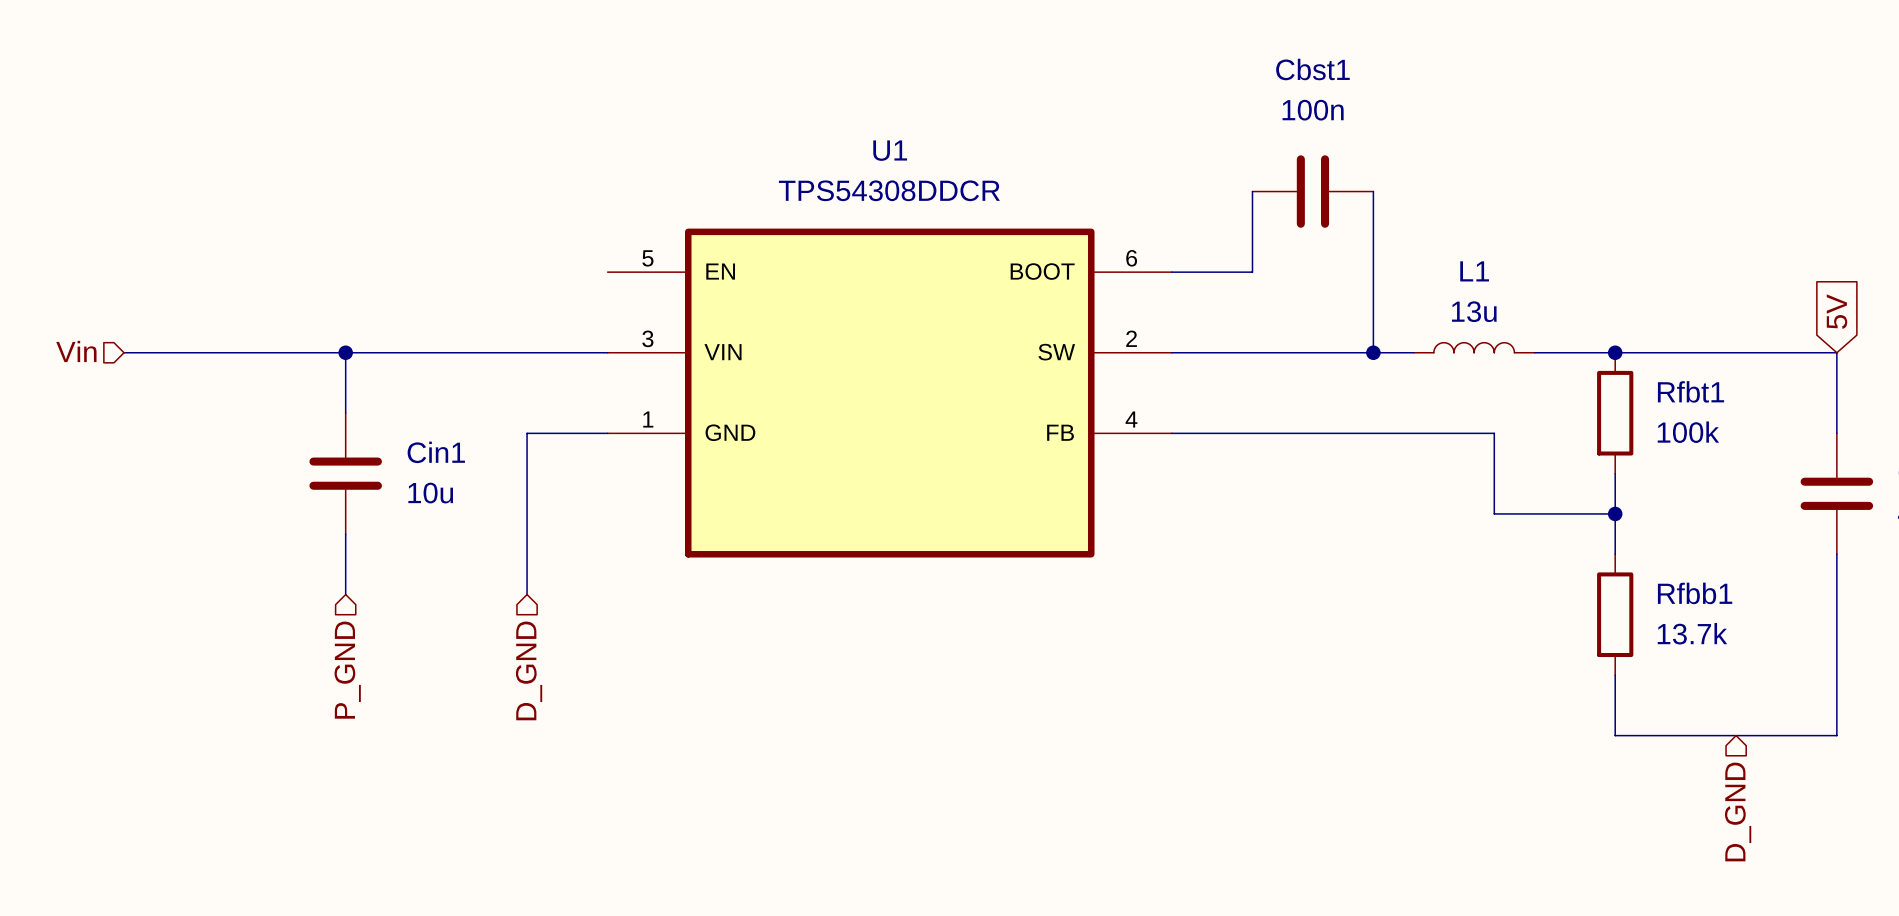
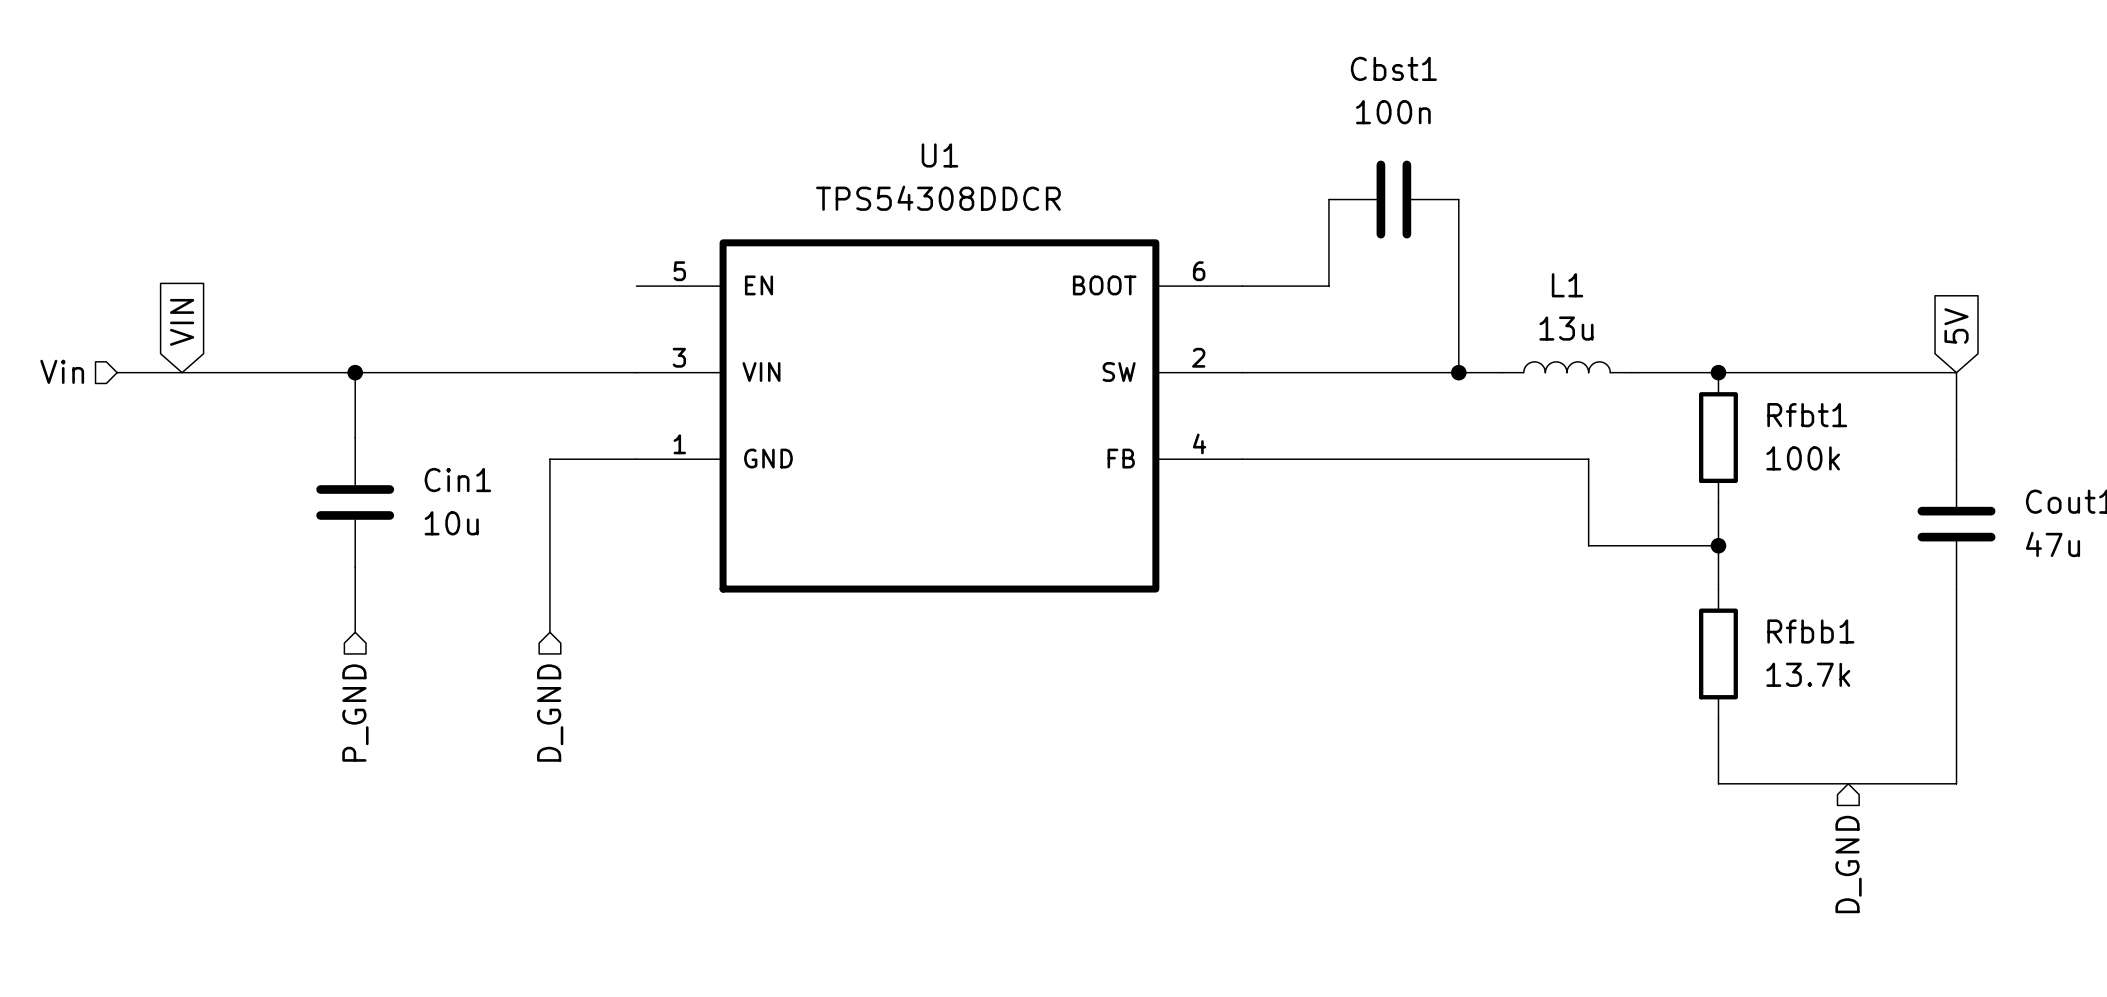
global label: none -> VIN (182, 322)

